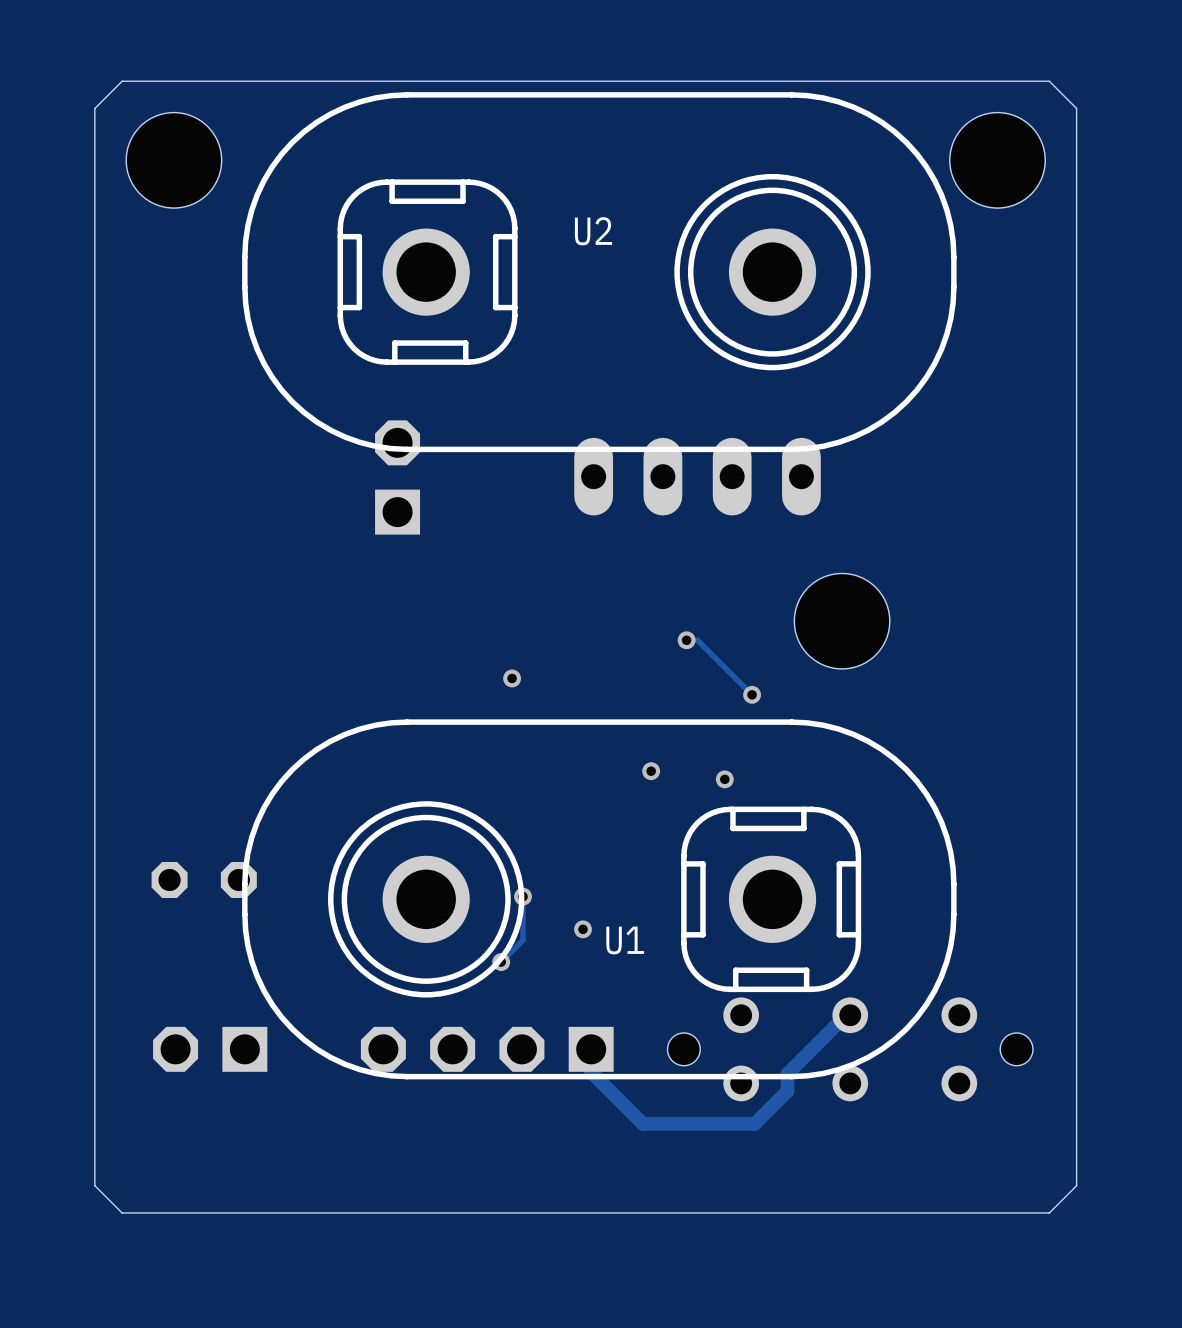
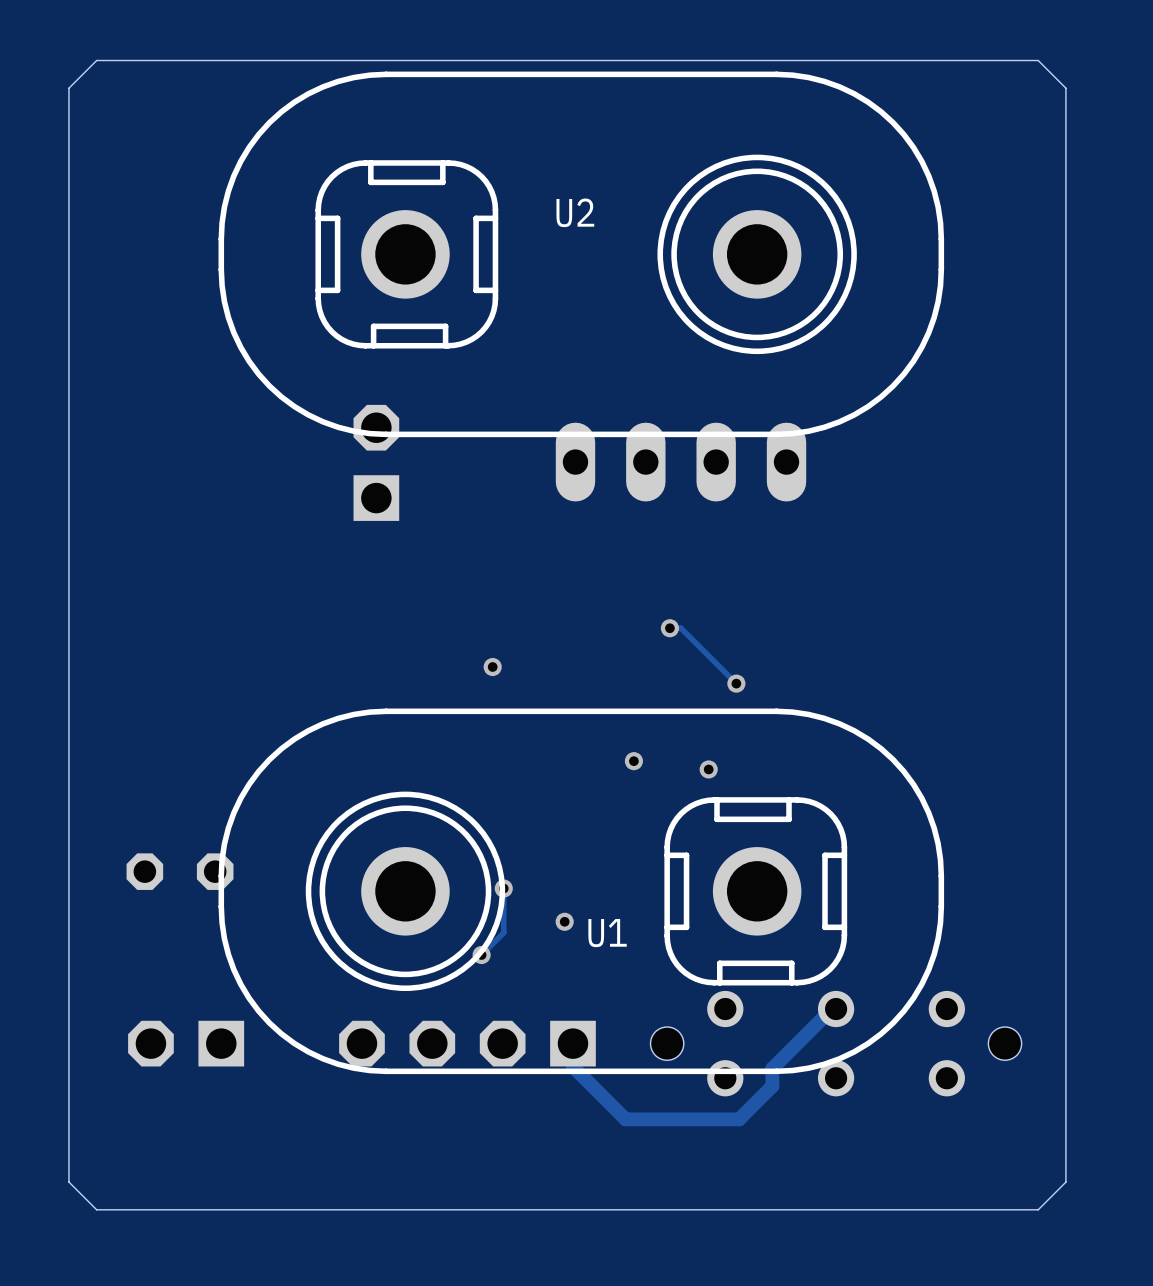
hole: (173, 160) -> none
hole: (997, 160) -> none
hole: (842, 621) -> none

